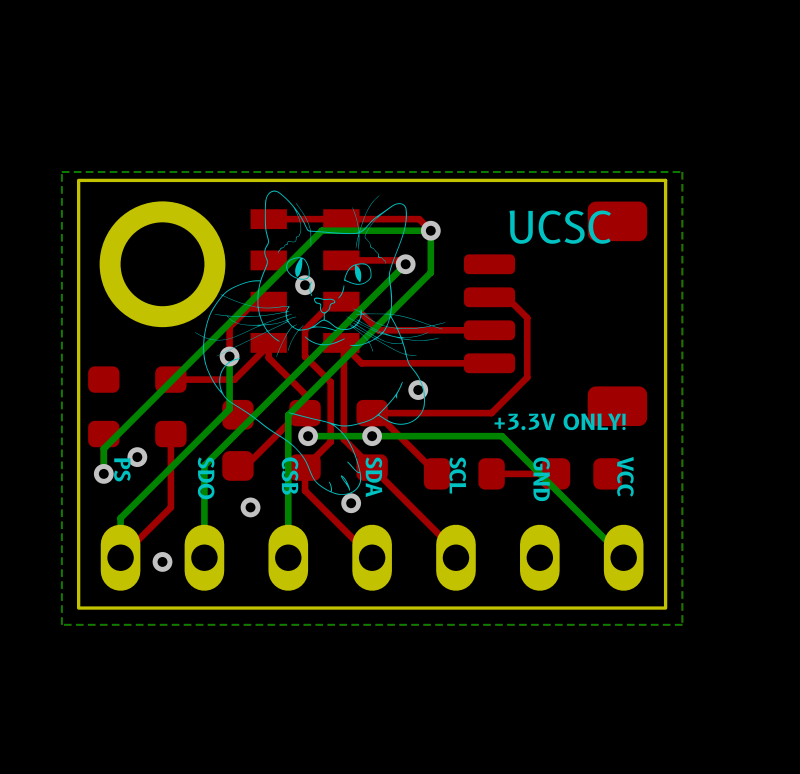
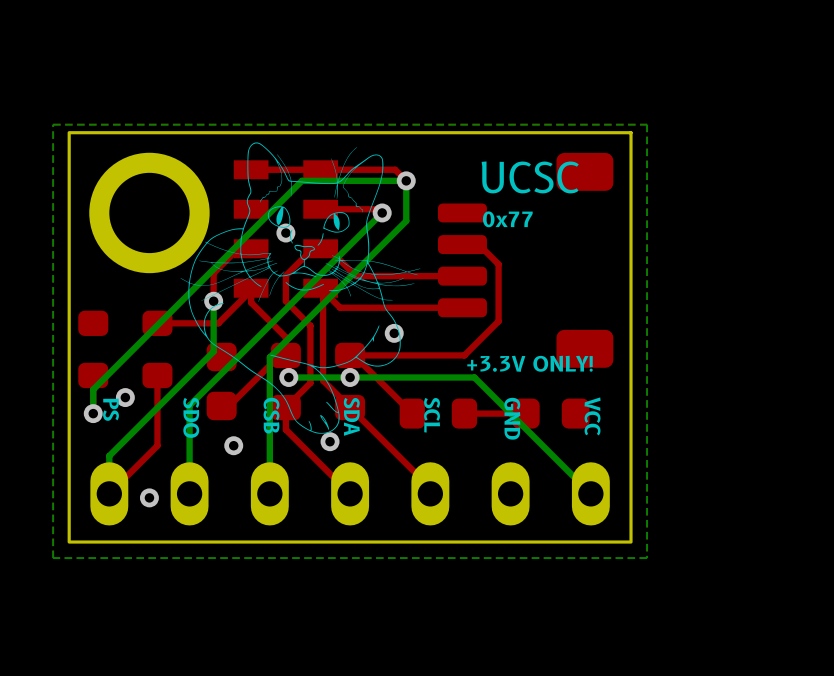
text: none -> 0x77 (507, 219)

